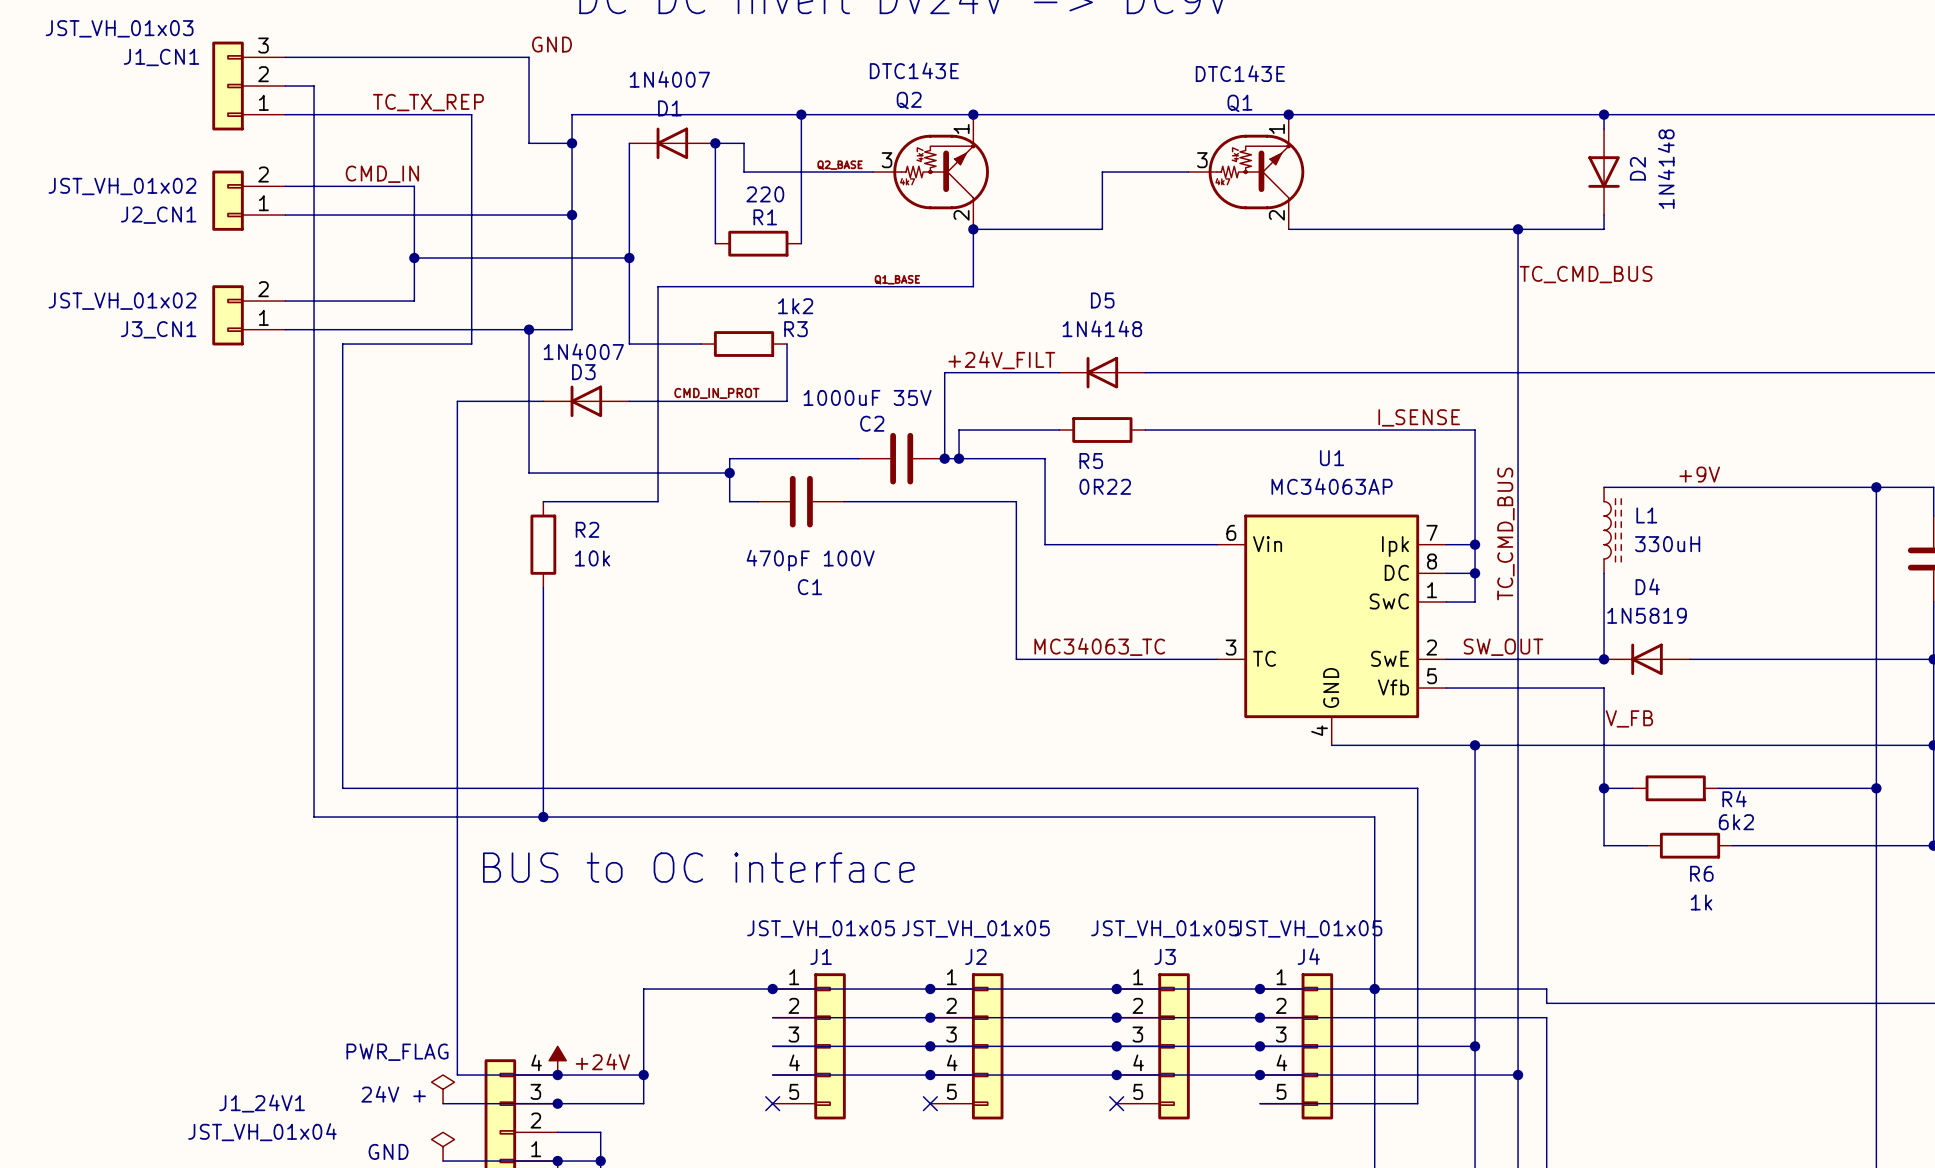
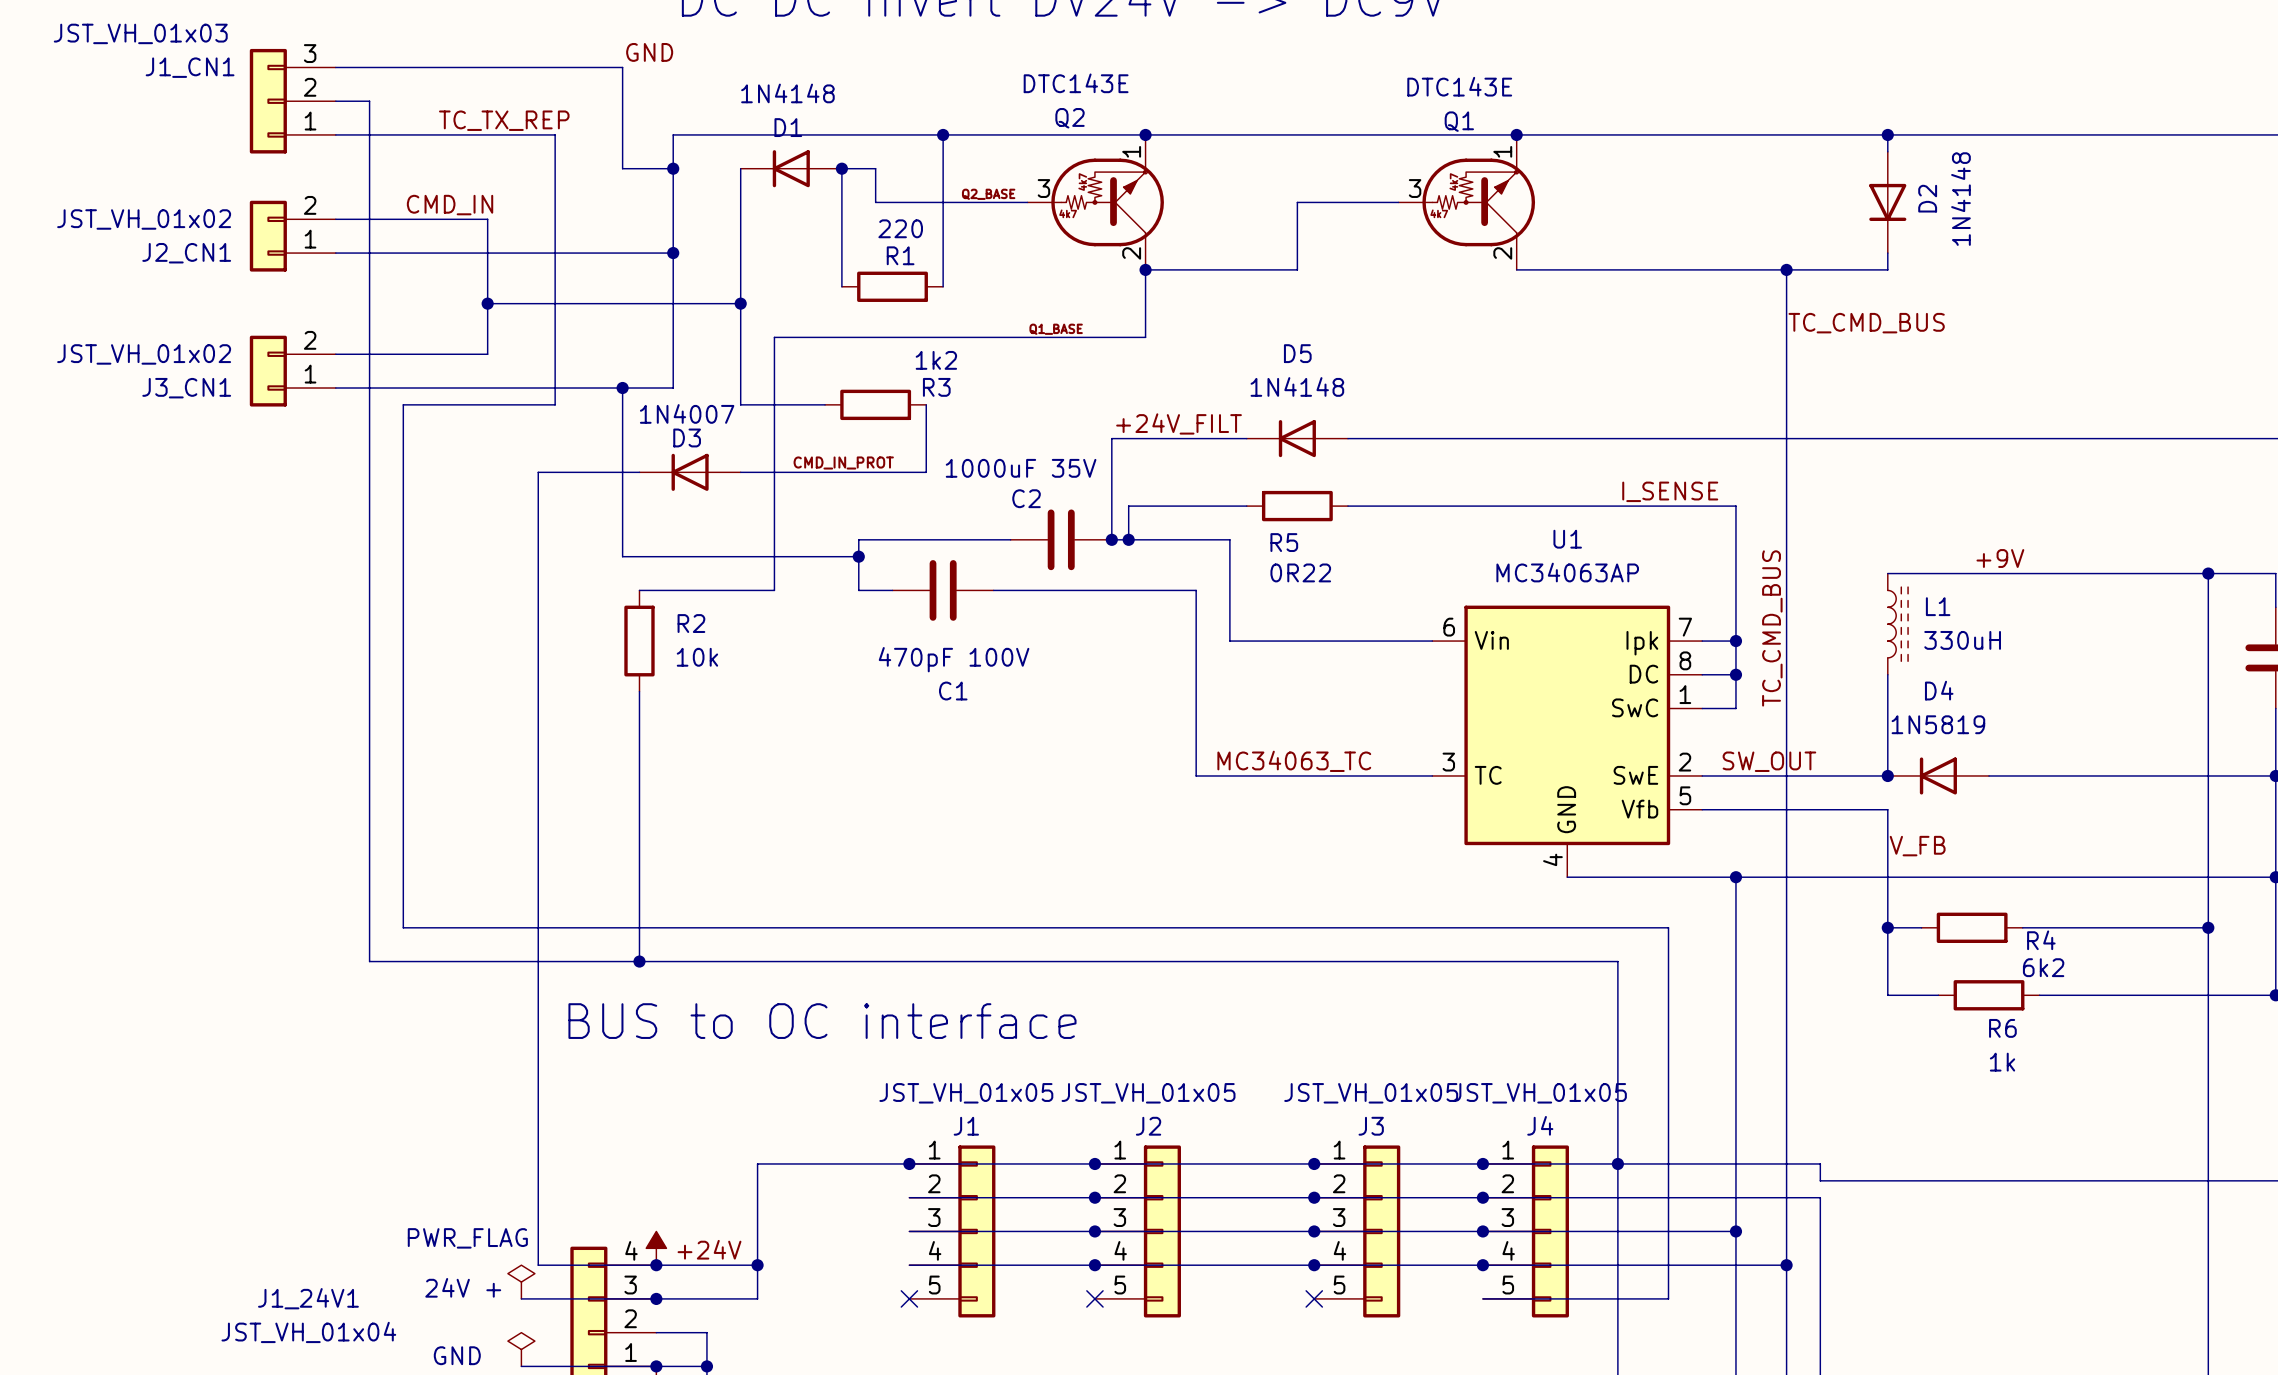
D1 value: 1N4007 (669, 79) -> 1N4148 (787, 93)

